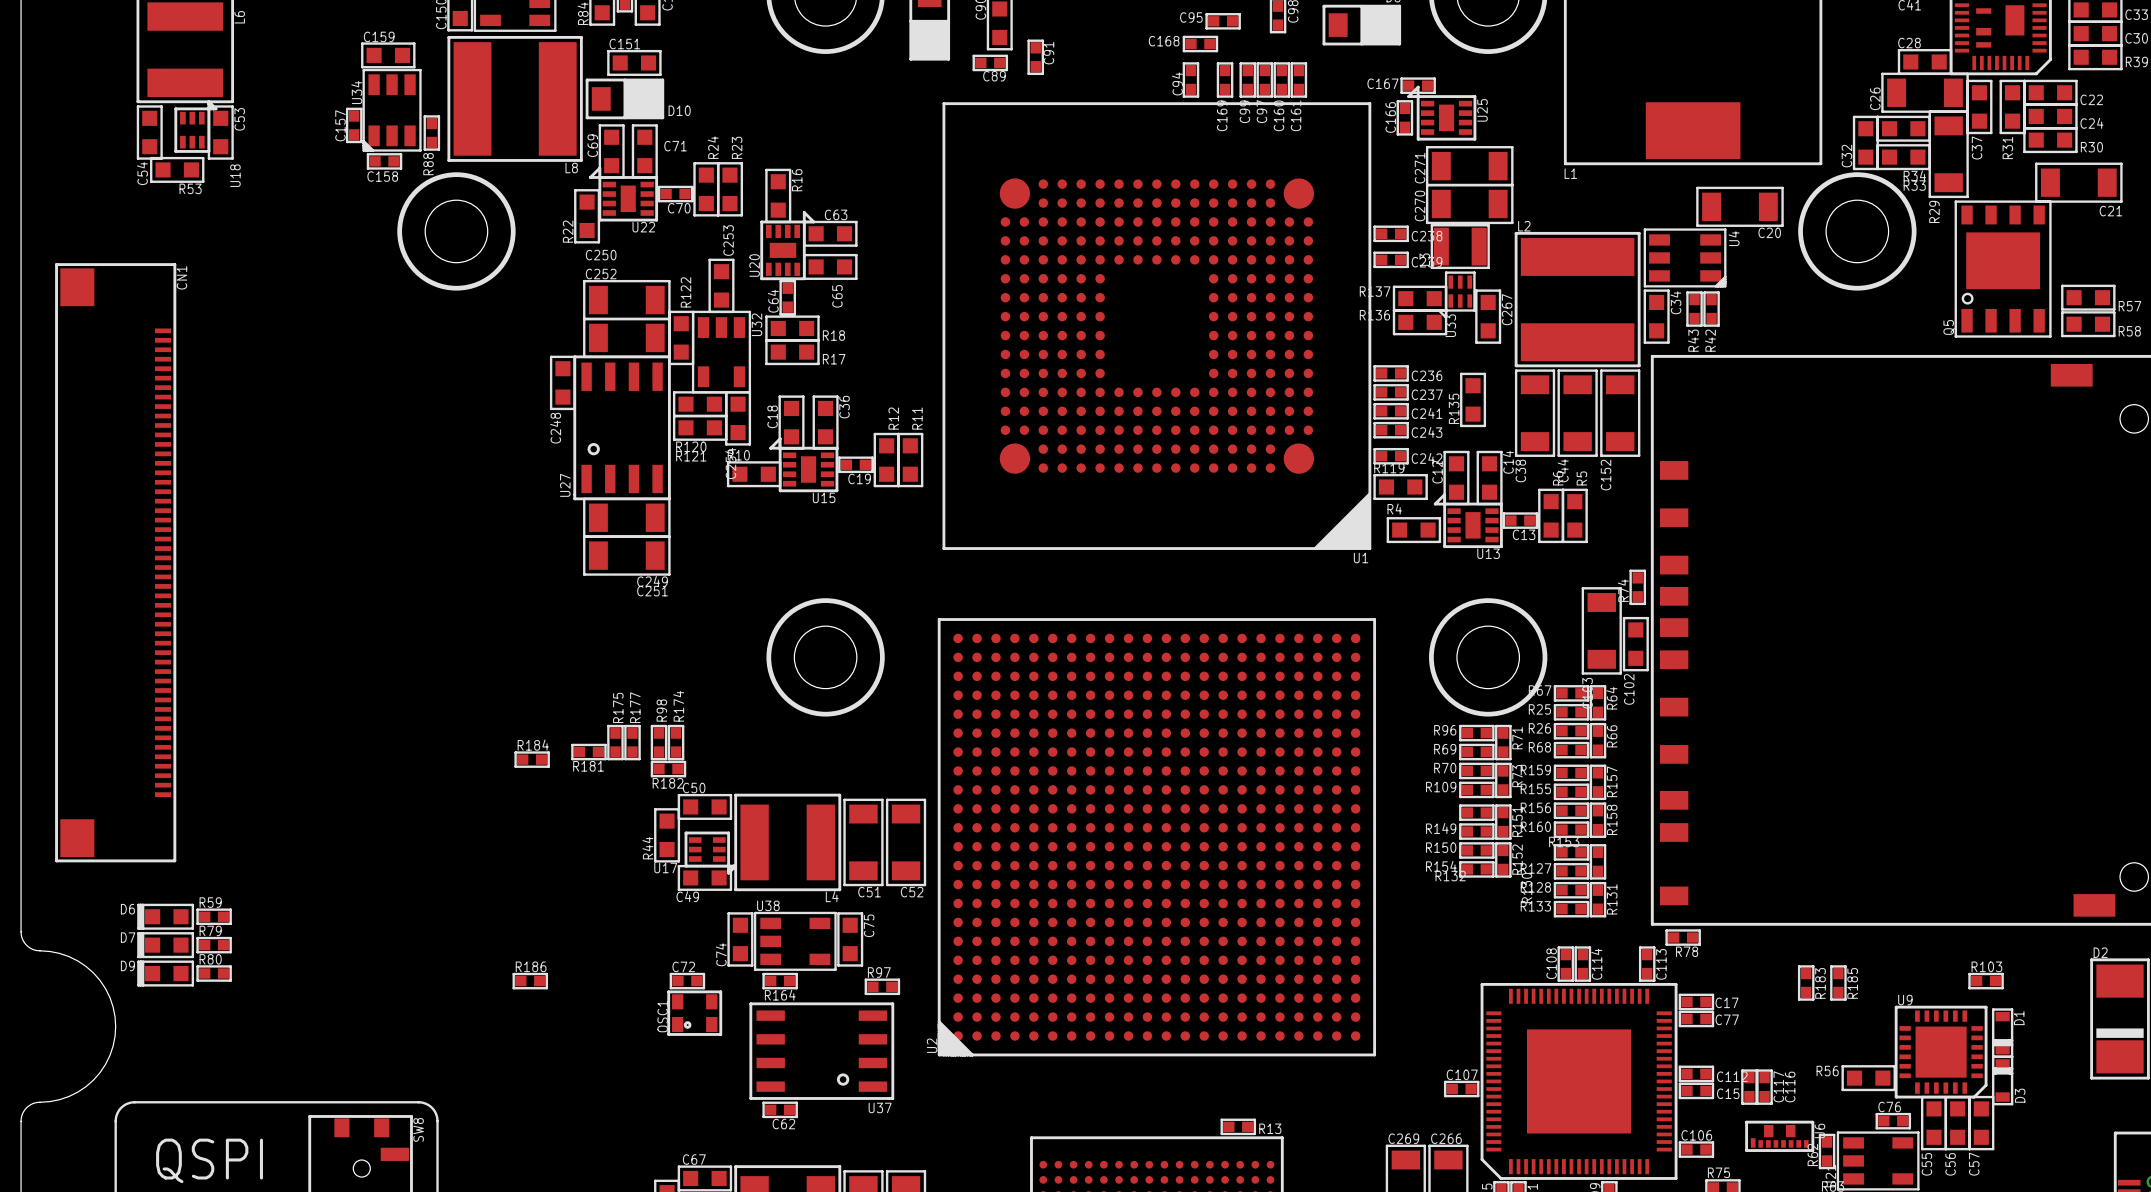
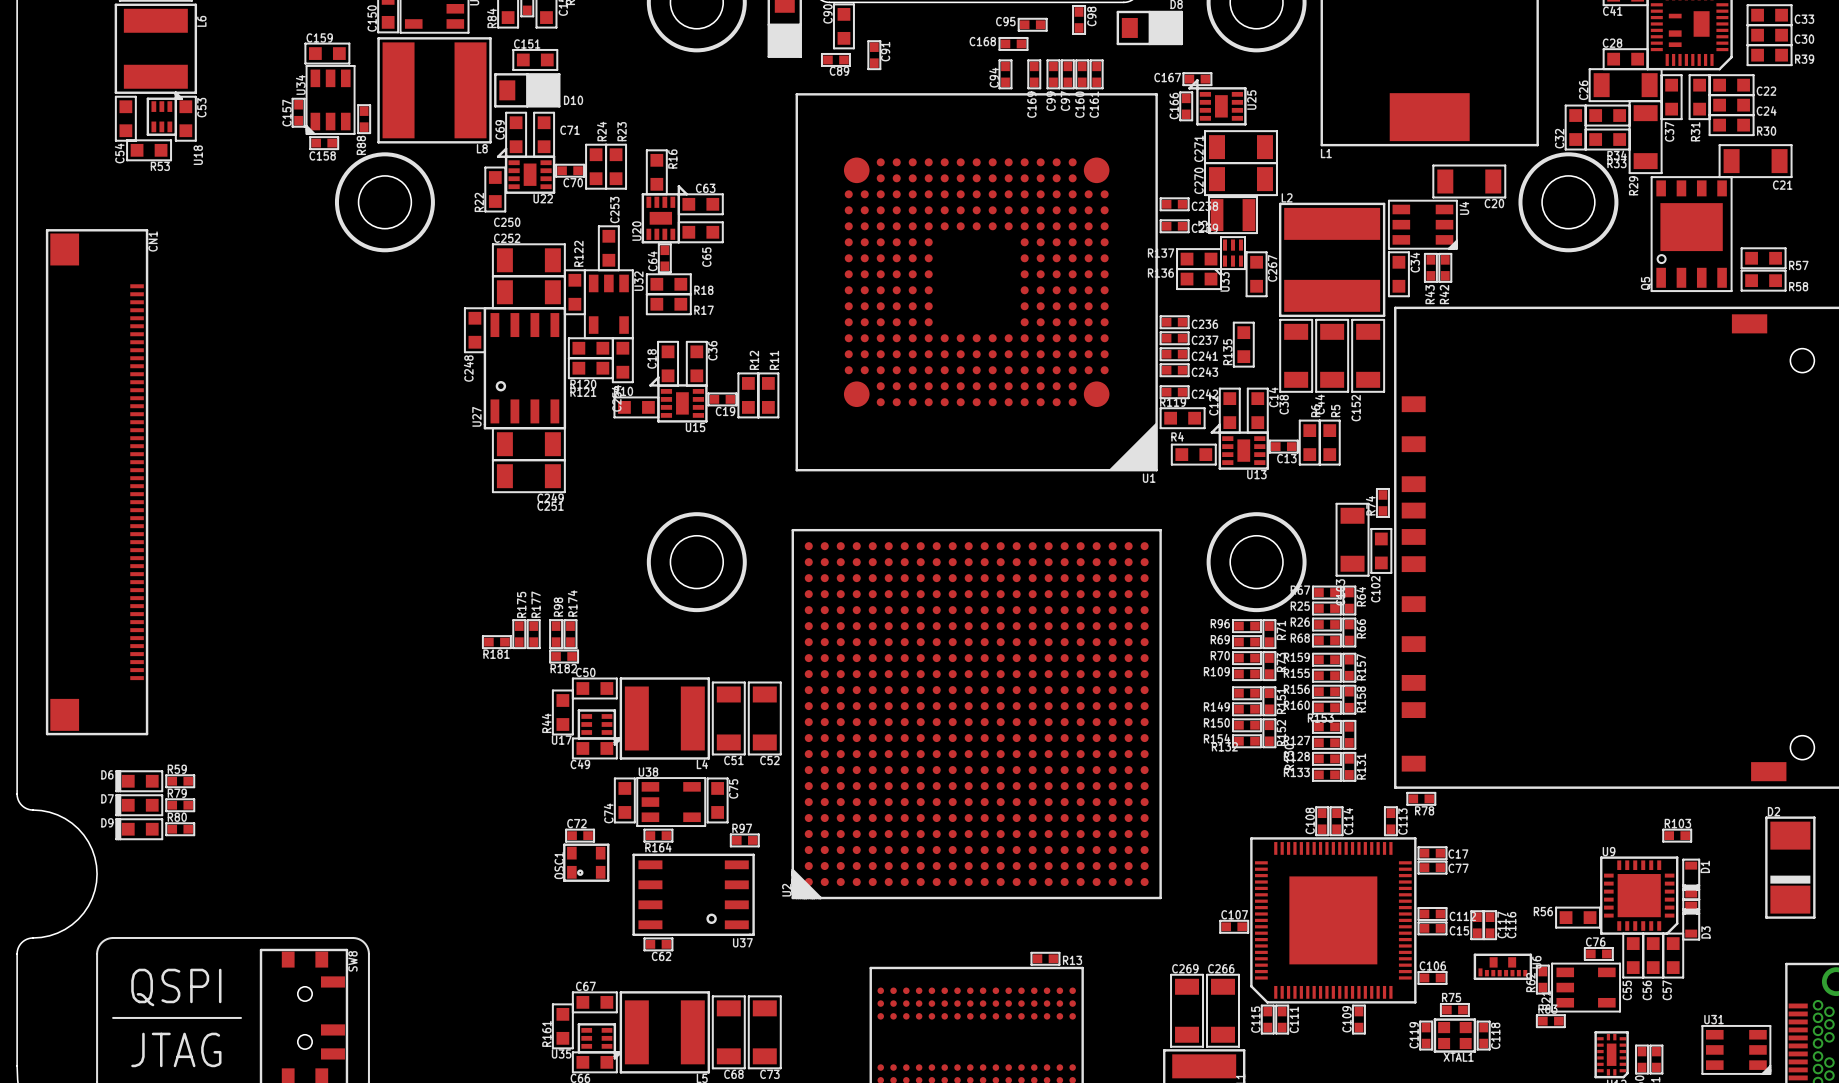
R184: (532, 759) -> none
R186: (530, 981) -> none
R183: (1806, 983) -> none
R185: (1838, 983) -> none

